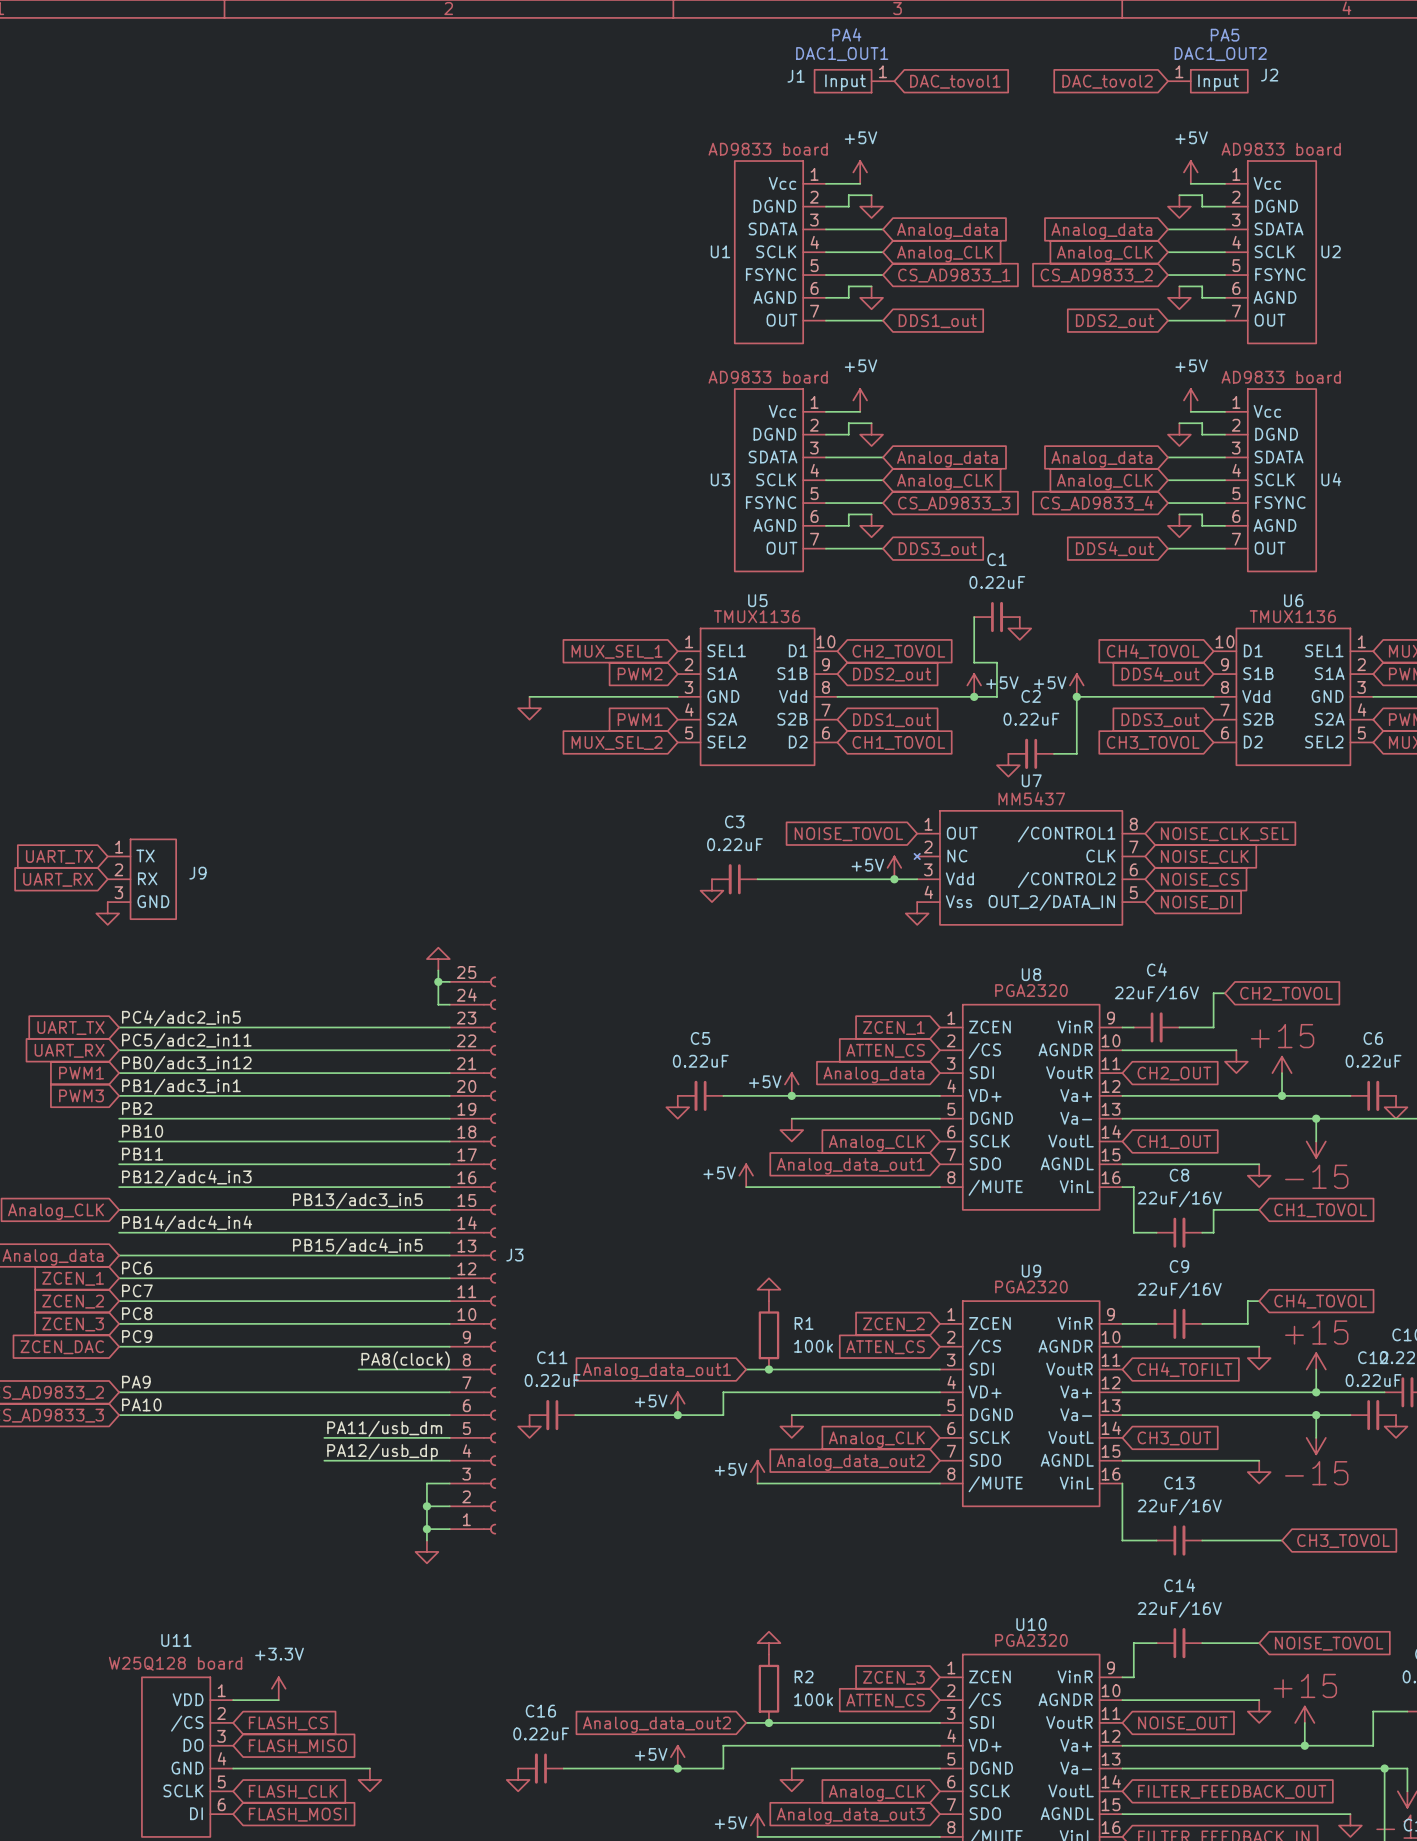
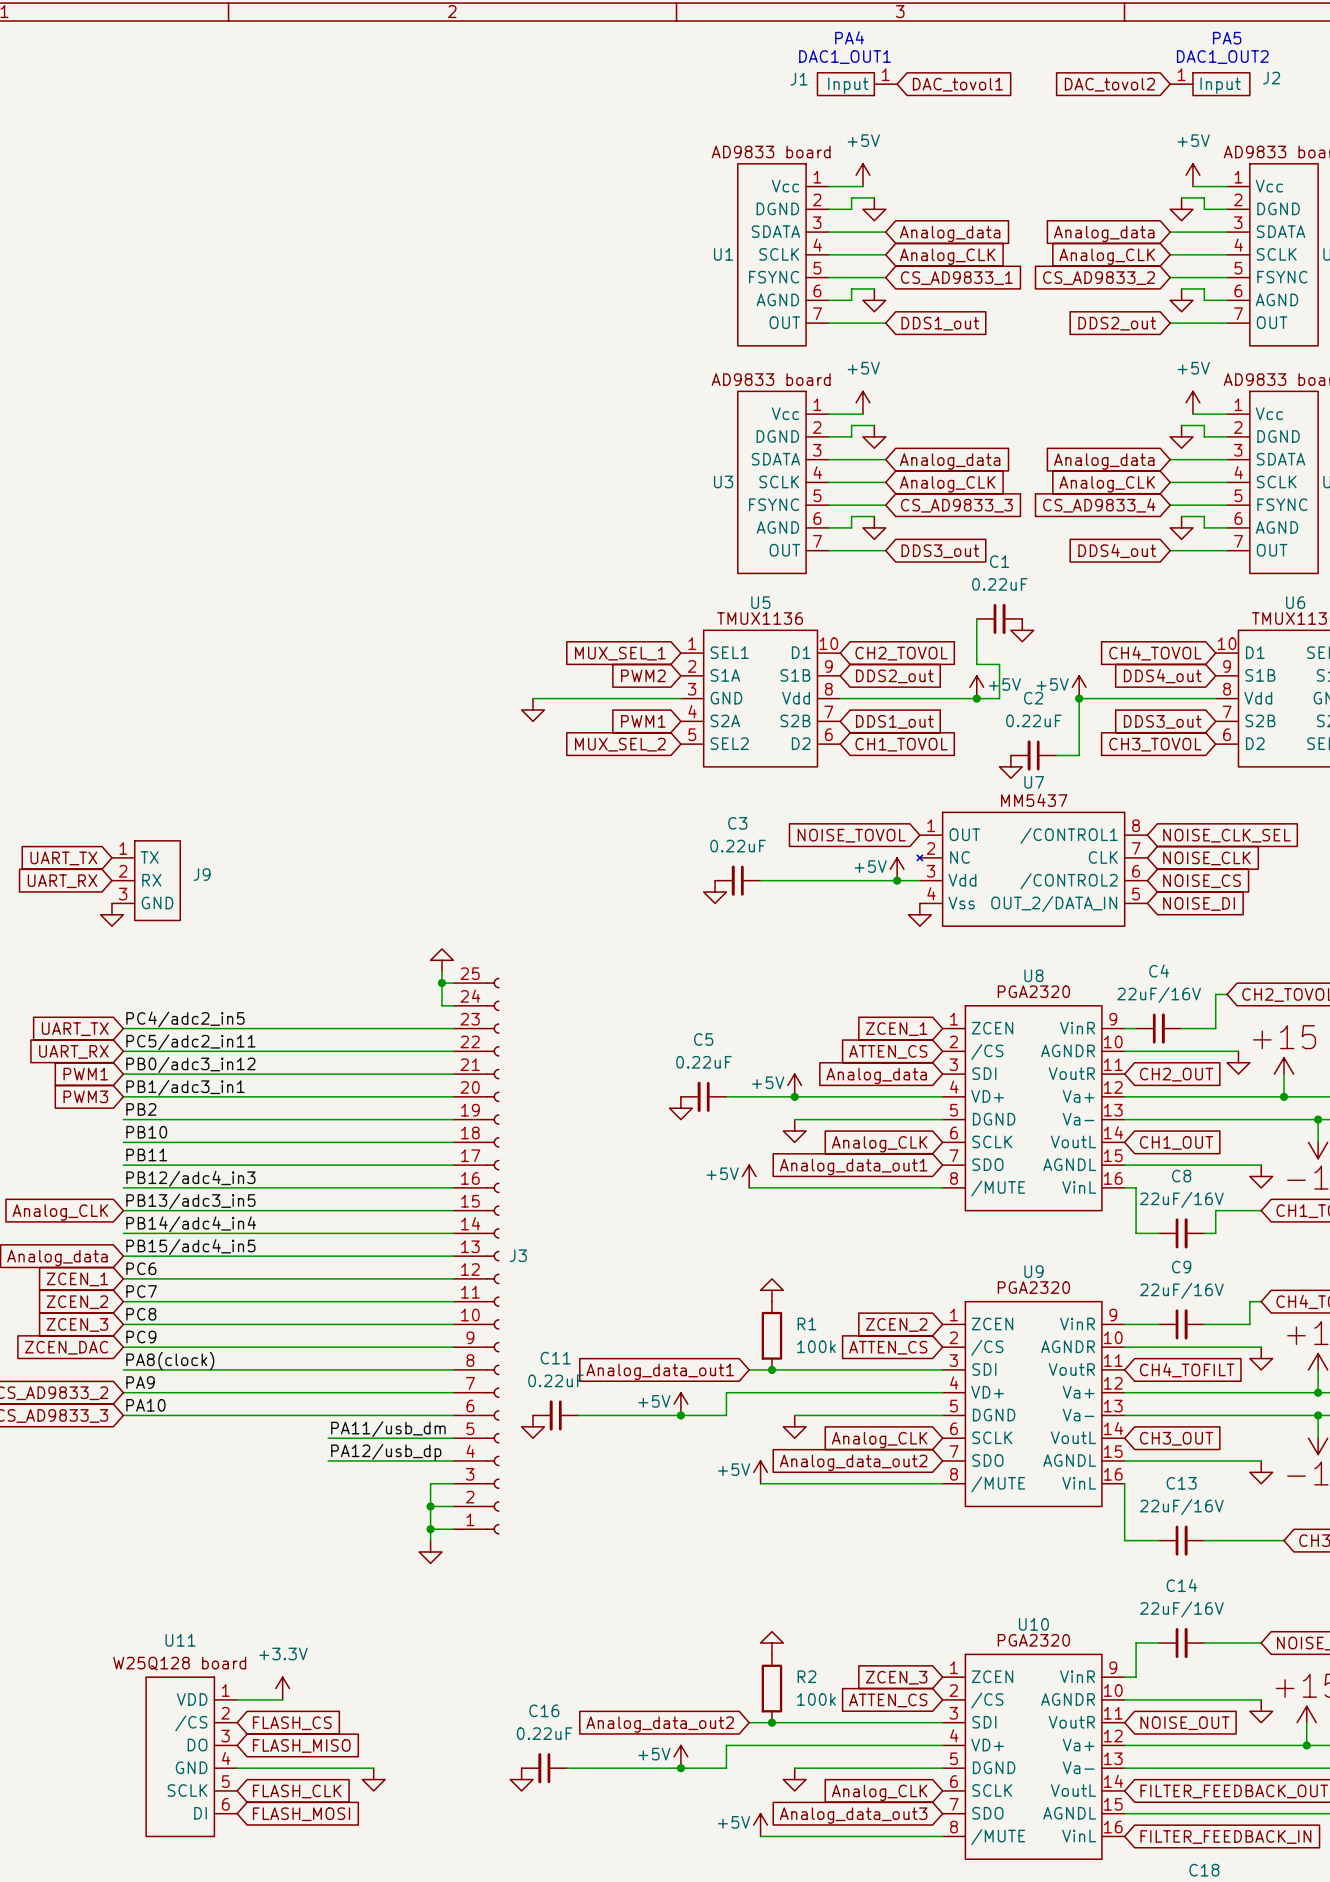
label position: PB13/adc3_in5 (357, 1200) -> PB13/adc3_in5 (190, 1201)
label position: PB15/adc4_in5 (357, 1246) -> PB15/adc4_in5 (190, 1247)
label: none -> PA8(clock) (170, 1361)
label: PA8(clock) (405, 1360) -> none
wire: none -> (123, 1369) (362, 1369)

